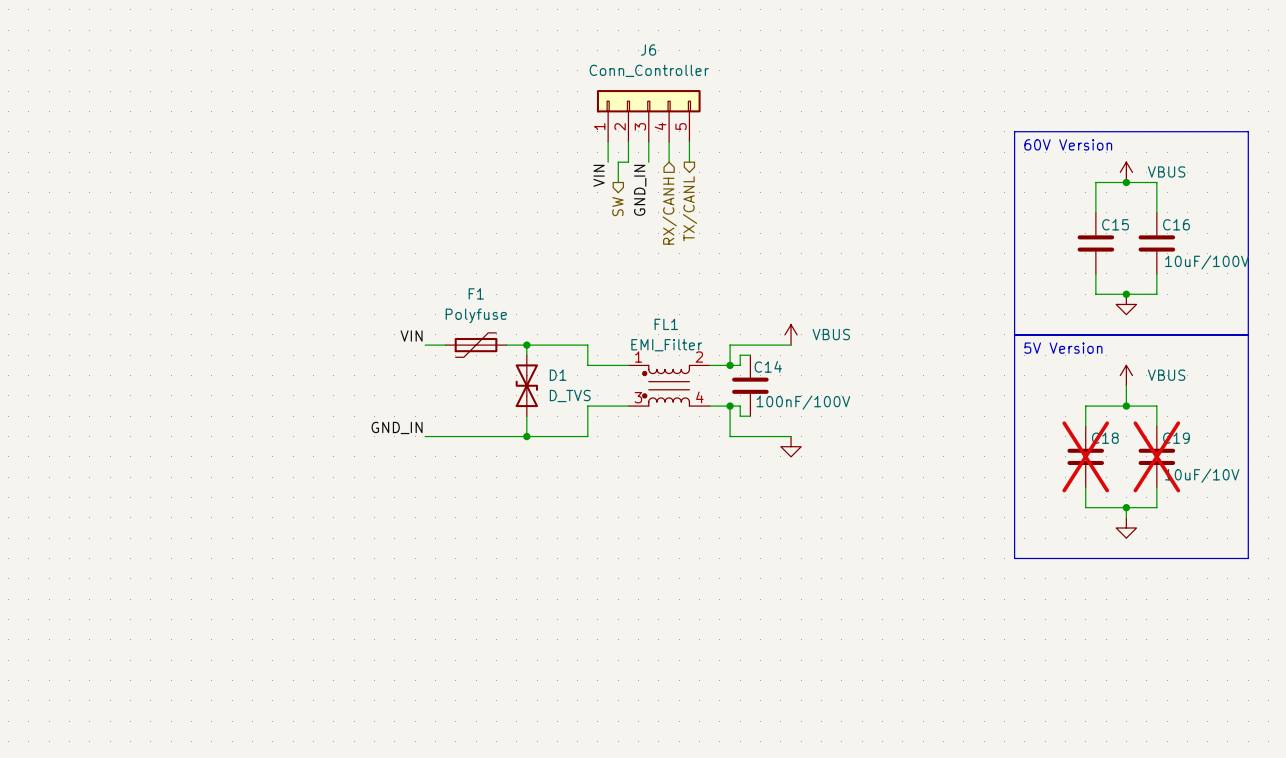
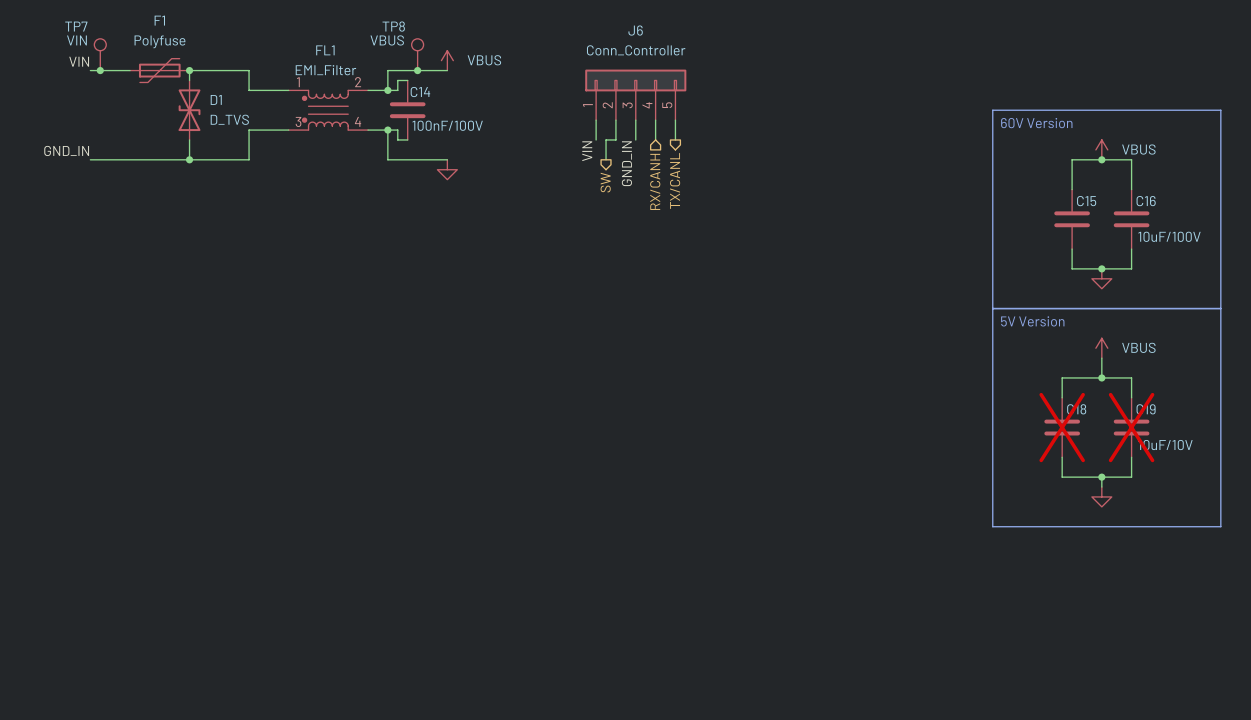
TP7: none -> VIN (100, 54)
TP8: none -> VBUS (417, 54)
power symbol: none -> VBUS (447, 60)
label: none -> VIN (79, 61)
wire: none -> (90, 70) (130, 70)
junction: none -> (100, 70)
junction: none -> (189, 70)
junction: none -> (417, 70)
wire: none -> (447, 70) (387, 70) (387, 90)
wire: none -> (189, 80) (189, 70) (249, 70) (249, 90) (288, 90)
wire: none -> (407, 80) (397, 80) (397, 90) (368, 90)
junction: none -> (387, 90)
wire: none -> (288, 130) (249, 130) (249, 159) (90, 159)
wire: none -> (368, 130) (397, 130) (397, 139) (407, 139)
wire: none -> (387, 130) (387, 159) (447, 159)
junction: none -> (387, 130)
wire: none -> (189, 139) (189, 159)
label: none -> GND_IN (66, 150)
junction: none -> (189, 159)
power symbol: none -> (447, 169)
power symbol: VBUS (791, 334) -> none
label: VIN (411, 336) -> none
wire: (425, 345) (445, 345) -> none
F1 position: (476, 345) -> (159, 70)
wire: (506, 345) (587, 345) (587, 365) (628, 365) -> none
wire: (526, 345) (526, 355) -> none
junction: (526, 345) -> none
wire: (791, 345) (730, 345) (730, 365) -> none
wire: (750, 355) (740, 355) (740, 365) (709, 365) -> none
junction: (730, 365) -> none
D1 position: (526, 385) -> (189, 110)
FL1 position: (669, 385) -> (328, 110)
C14 position: (750, 385) -> (407, 110)
wire: (628, 406) (587, 406) (587, 436) (425, 436) -> none
wire: (709, 406) (740, 406) (740, 416) (750, 416) -> none
wire: (730, 406) (730, 436) (791, 436) -> none
junction: (730, 406) -> none
wire: (526, 416) (526, 436) -> none
label: GND_IN (397, 427) -> none
junction: (526, 436) -> none
power symbol: (791, 446) -> none

